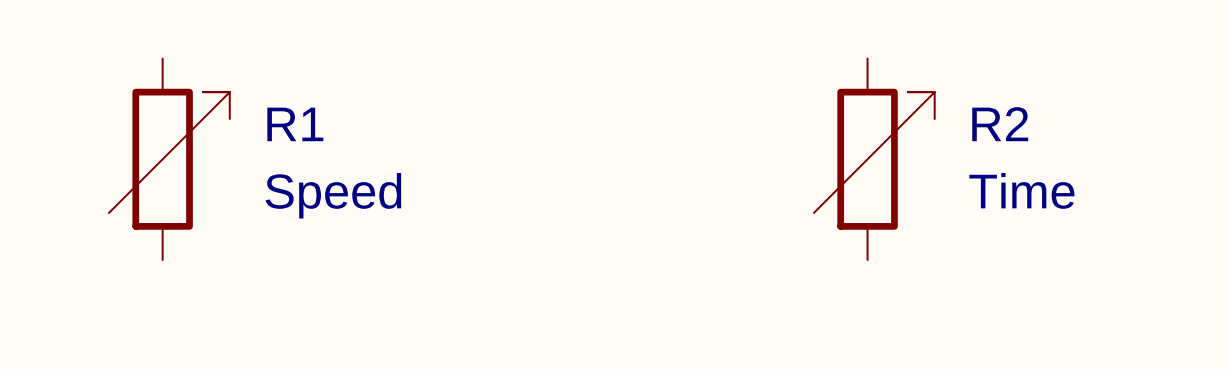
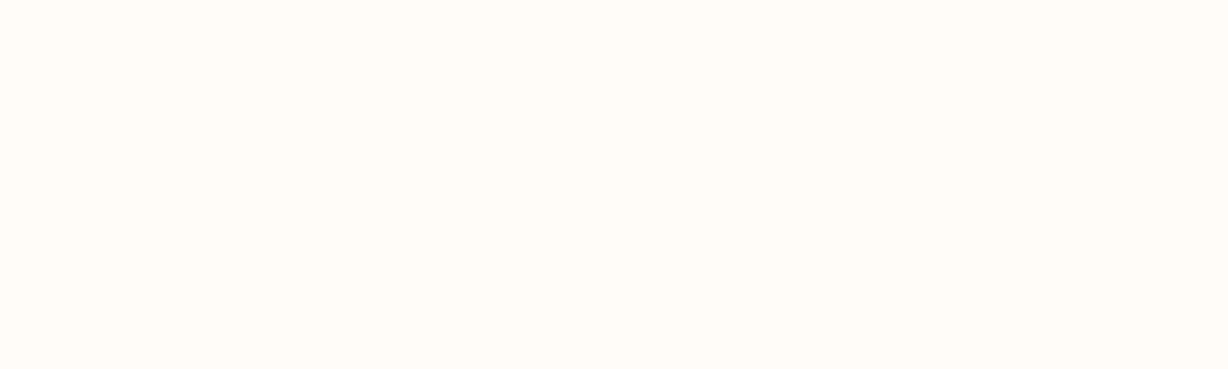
R1: Speed (169, 159) -> none
R2: Time (874, 159) -> none

